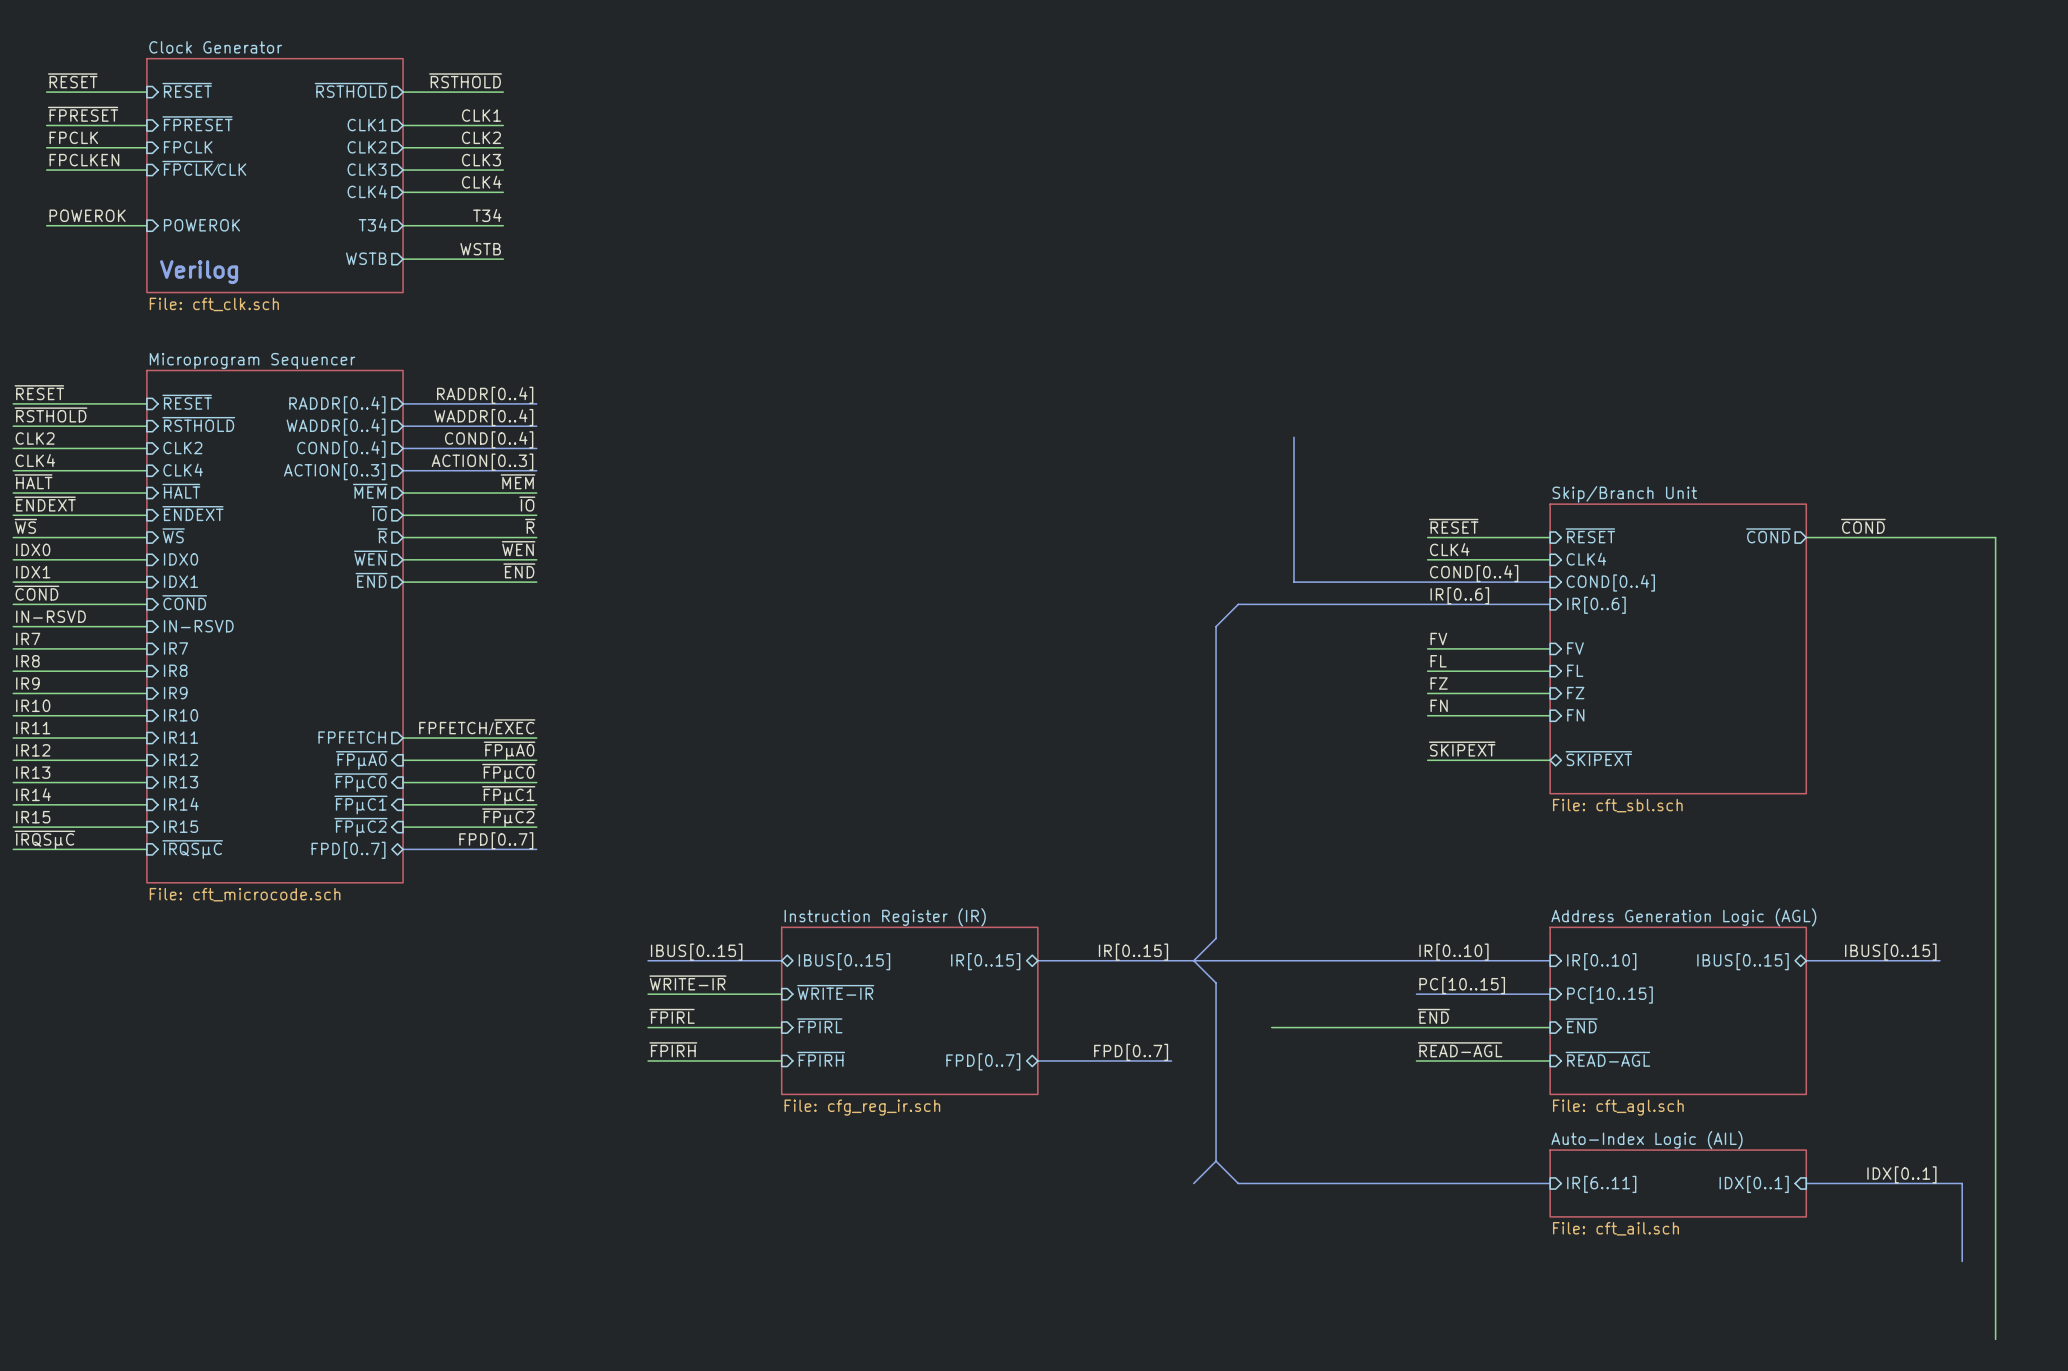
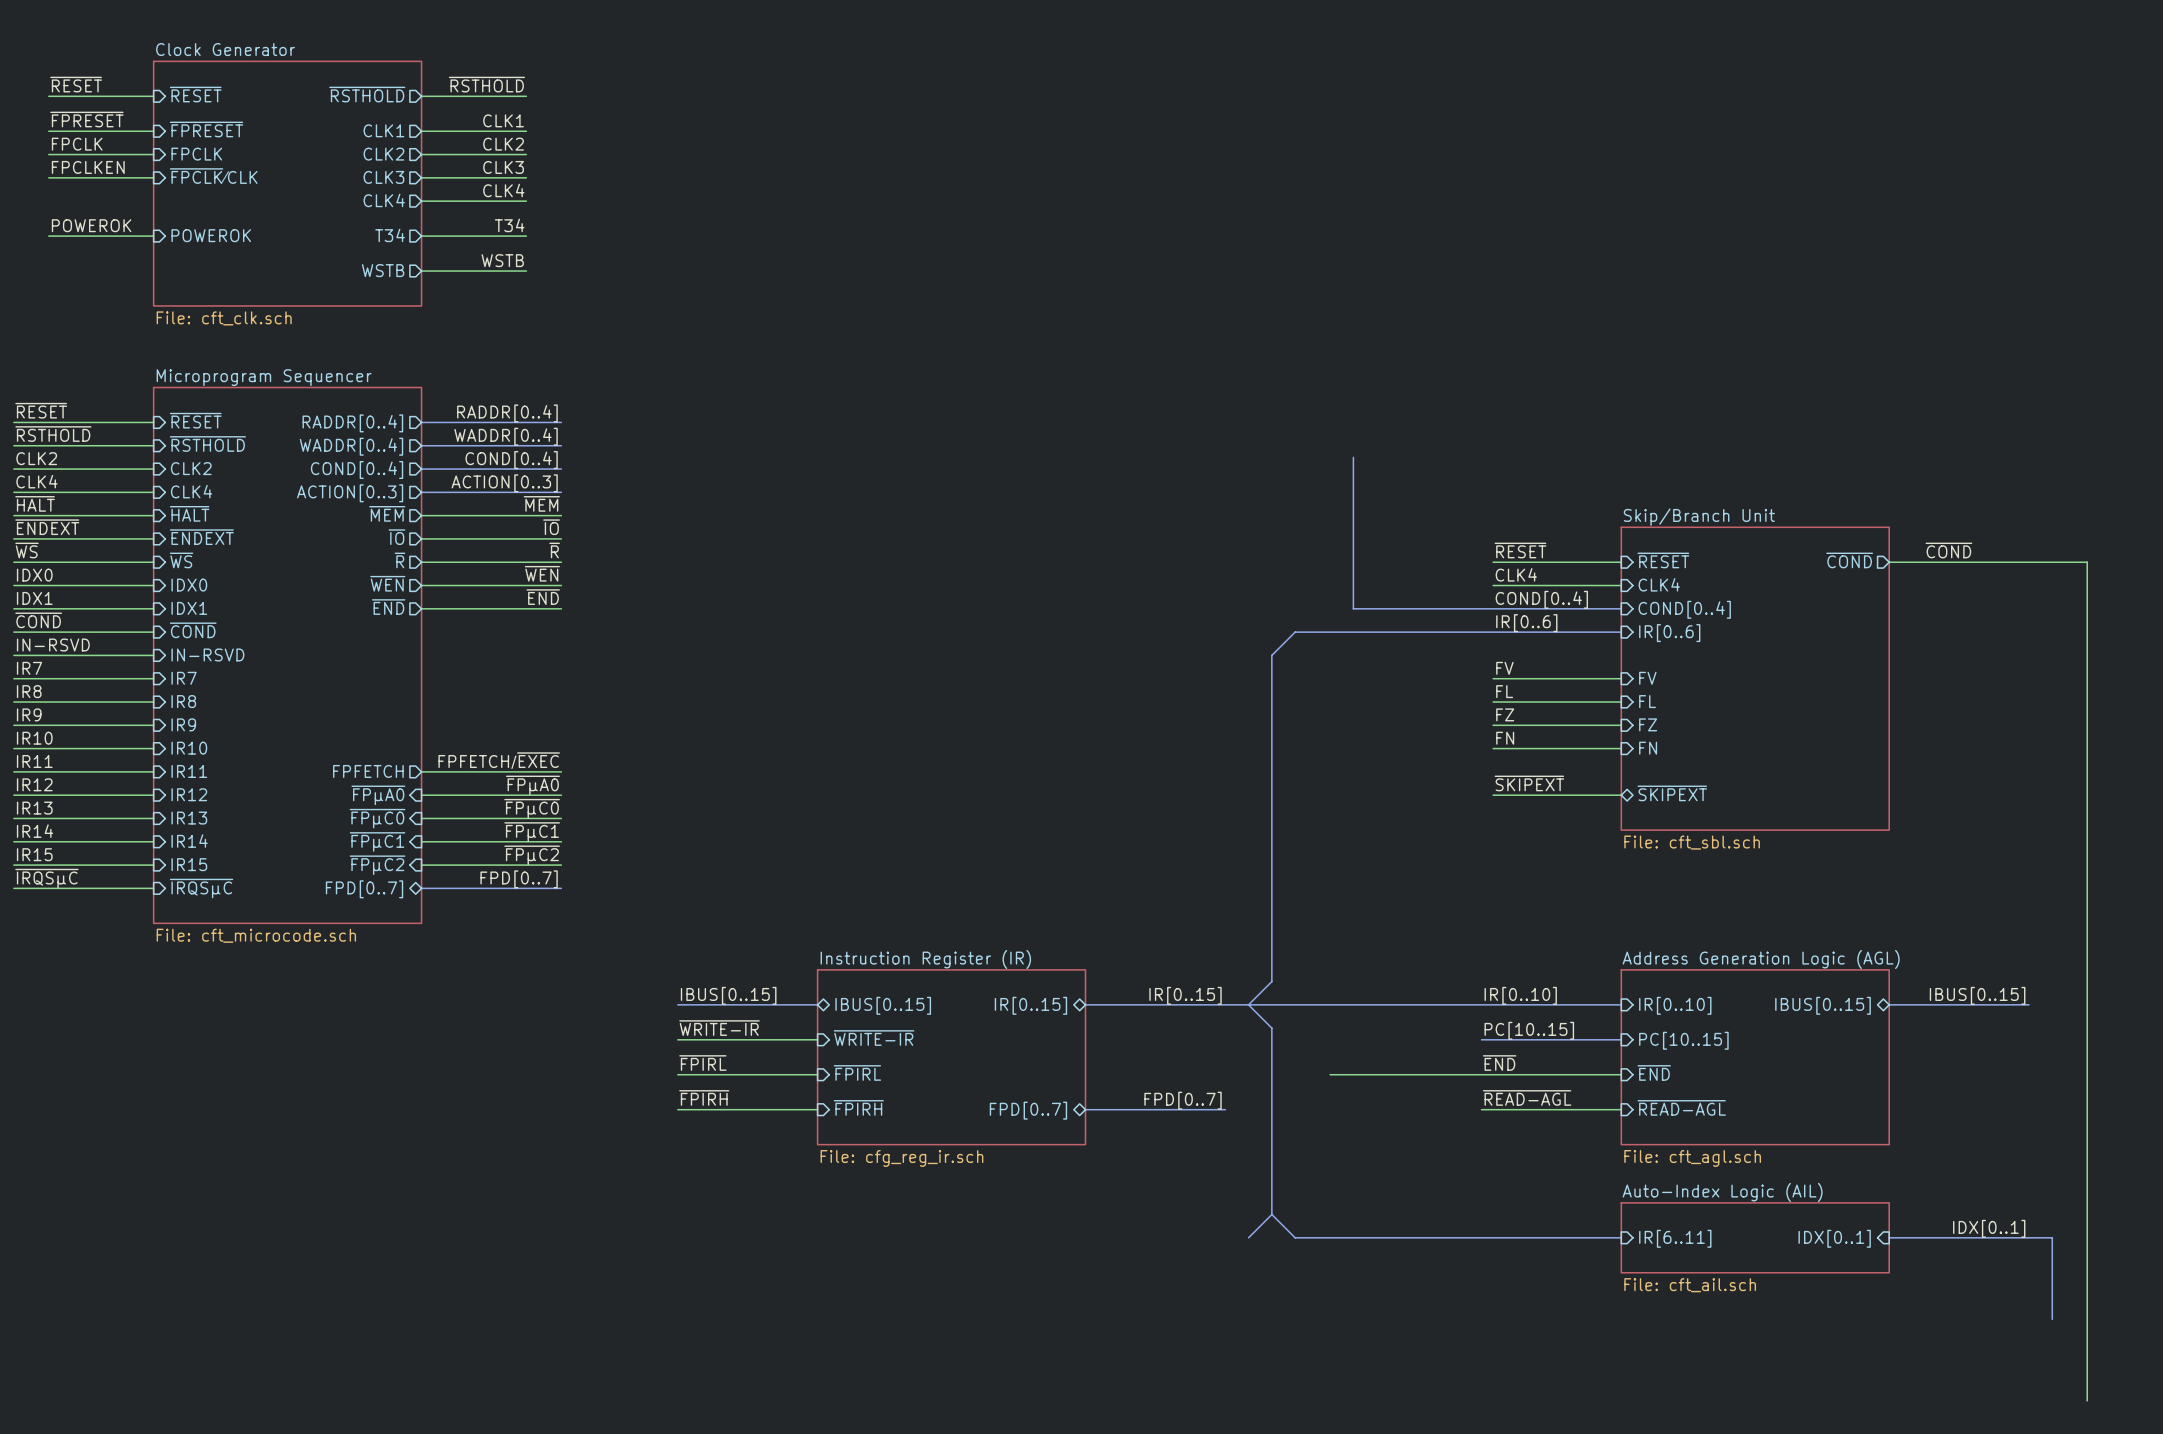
text: Verilog (199, 272) -> none

